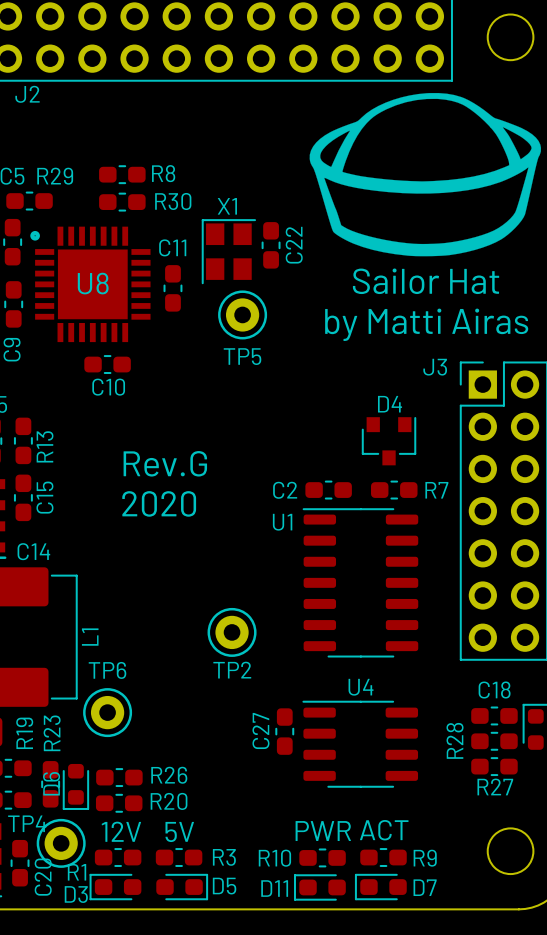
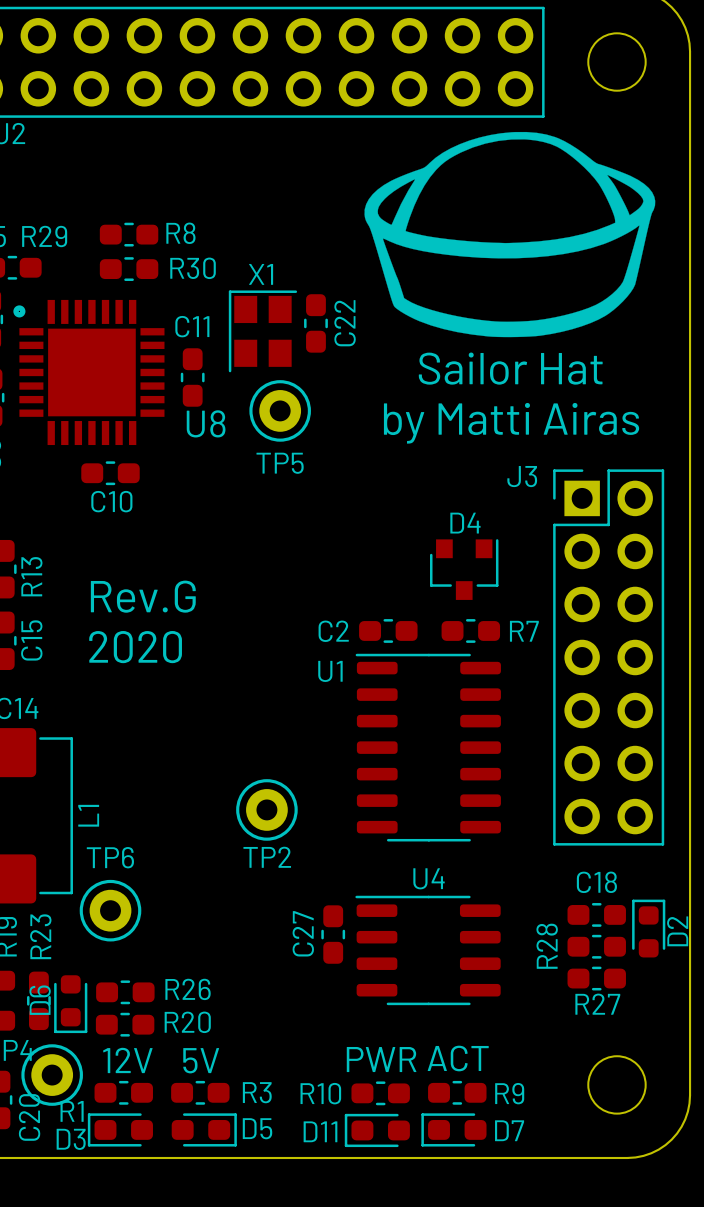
U8 name position: U8 (93, 283) -> U8 (206, 423)
text position: Rev.G (165, 463) -> Rev.G (143, 596)
text position: 2020 (159, 503) -> 2020 (135, 647)

